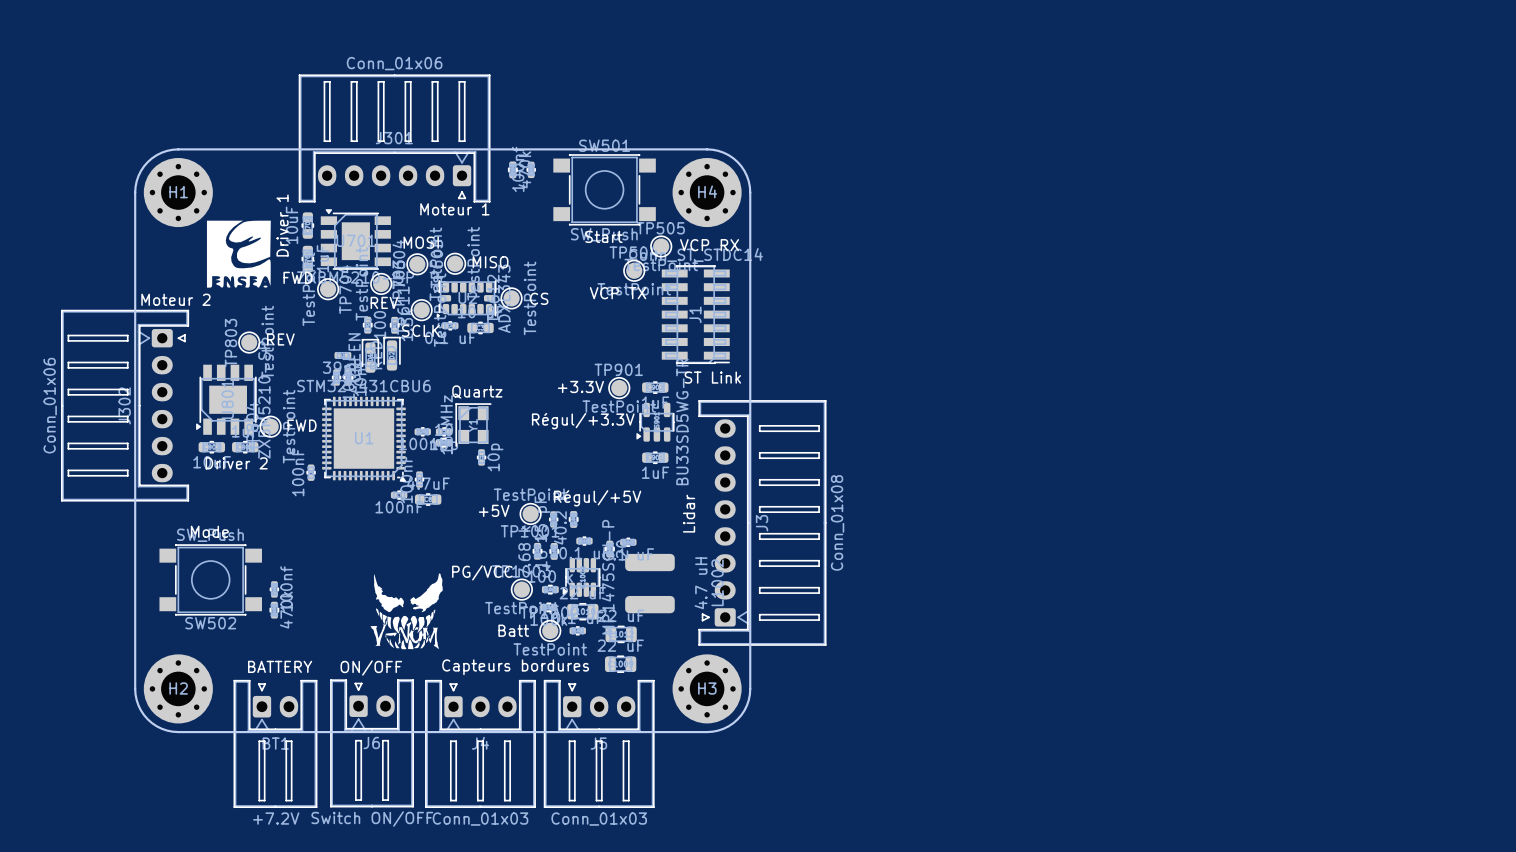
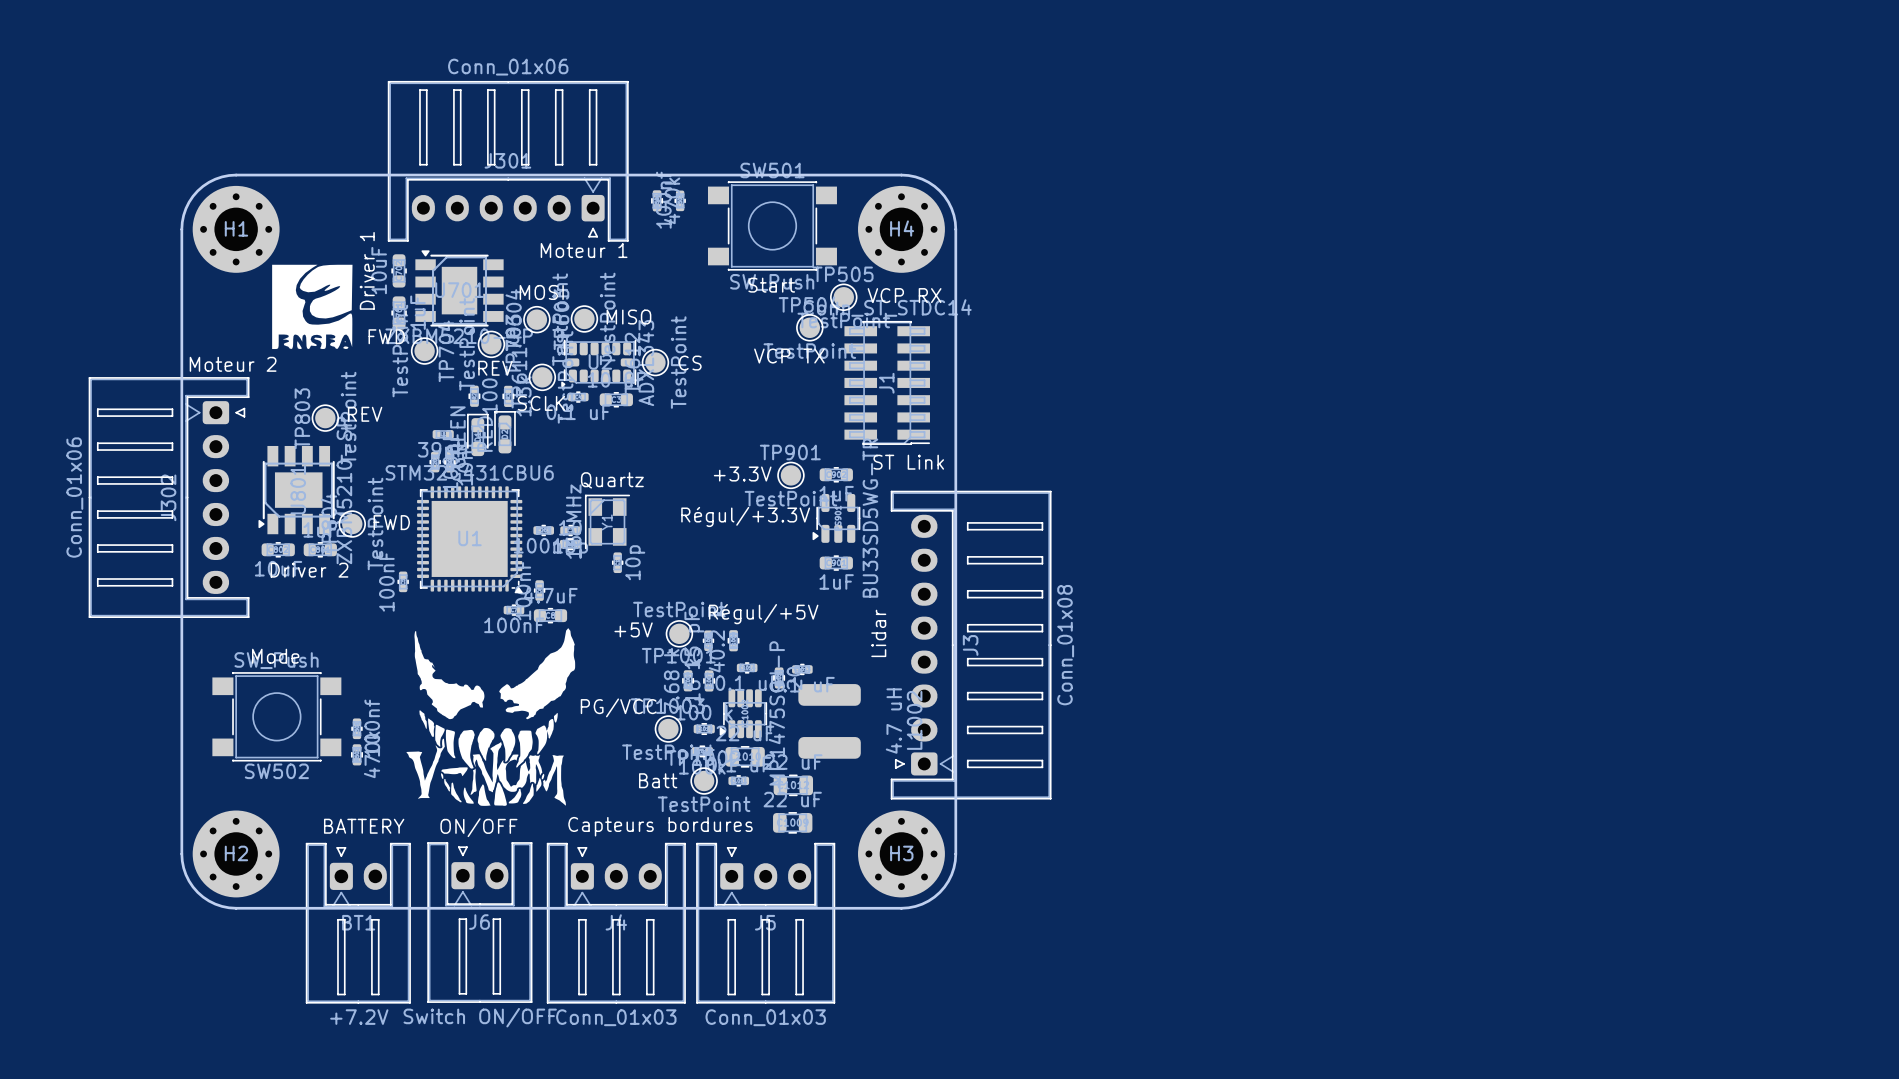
drawing: none -> [406, 628, 576, 806]
drawing: [370, 573, 443, 650] -> none

